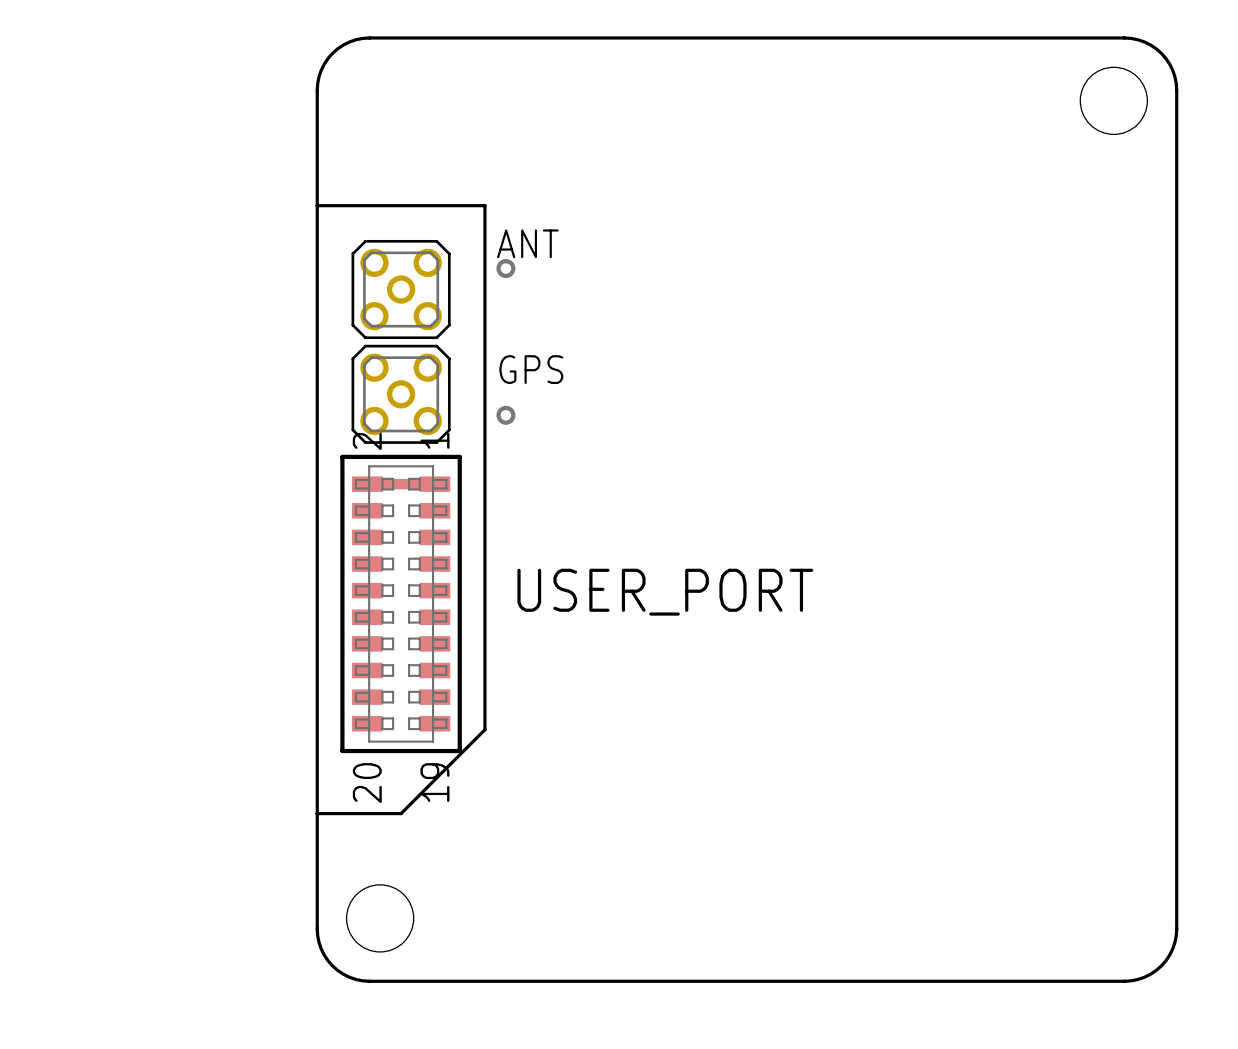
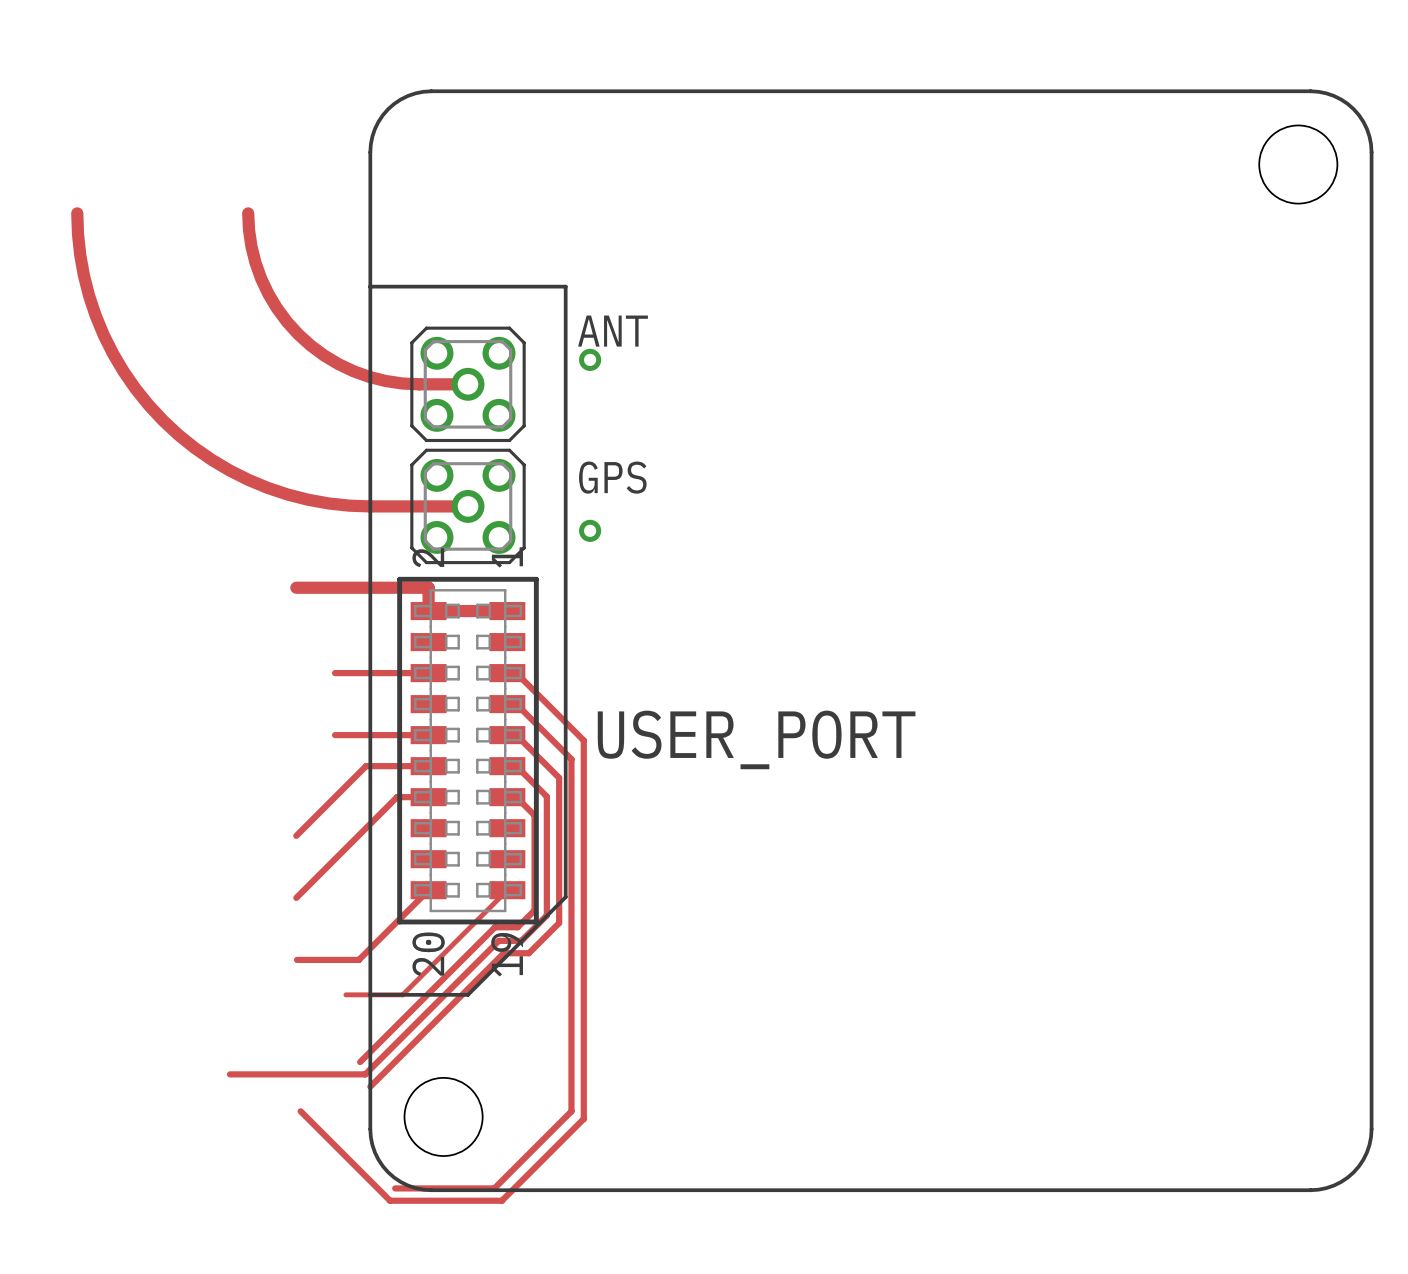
track: none -> (77, 213) (83, 275) (103, 335) (135, 388) (163, 420) (194, 447) (248, 479) (308, 499) (349, 505) (468, 506)
track: none -> (248, 213) (251, 246) (261, 278) (277, 308) (287, 321) (310, 345) (324, 355) (353, 371) (385, 381) (419, 384) (468, 384)
track: none -> (296, 587) (428, 587) (428, 611)
track: none -> (514, 671) (583, 740) (583, 1118) (501, 1200) (390, 1200) (300, 1111)
track: none -> (335, 673) (428, 673)
track: none -> (516, 704) (571, 759) (571, 1111) (494, 1188) (395, 1188)
track: none -> (514, 733) (559, 777) (559, 923) (528, 953) (503, 953) (370, 1086)
track: none -> (335, 735) (428, 735)
track: none -> (428, 766) (366, 766) (296, 835)
track: none -> (516, 766) (546, 796) (546, 915) (521, 940) (498, 940) (365, 1074) (229, 1074)
track: none -> (428, 797) (397, 797) (296, 897)
track: none -> (516, 797) (534, 815) (534, 910) (517, 927) (494, 927) (360, 1062)
track: none -> (428, 890) (358, 959) (297, 959)
track: none -> (507, 890) (402, 994) (345, 994)

